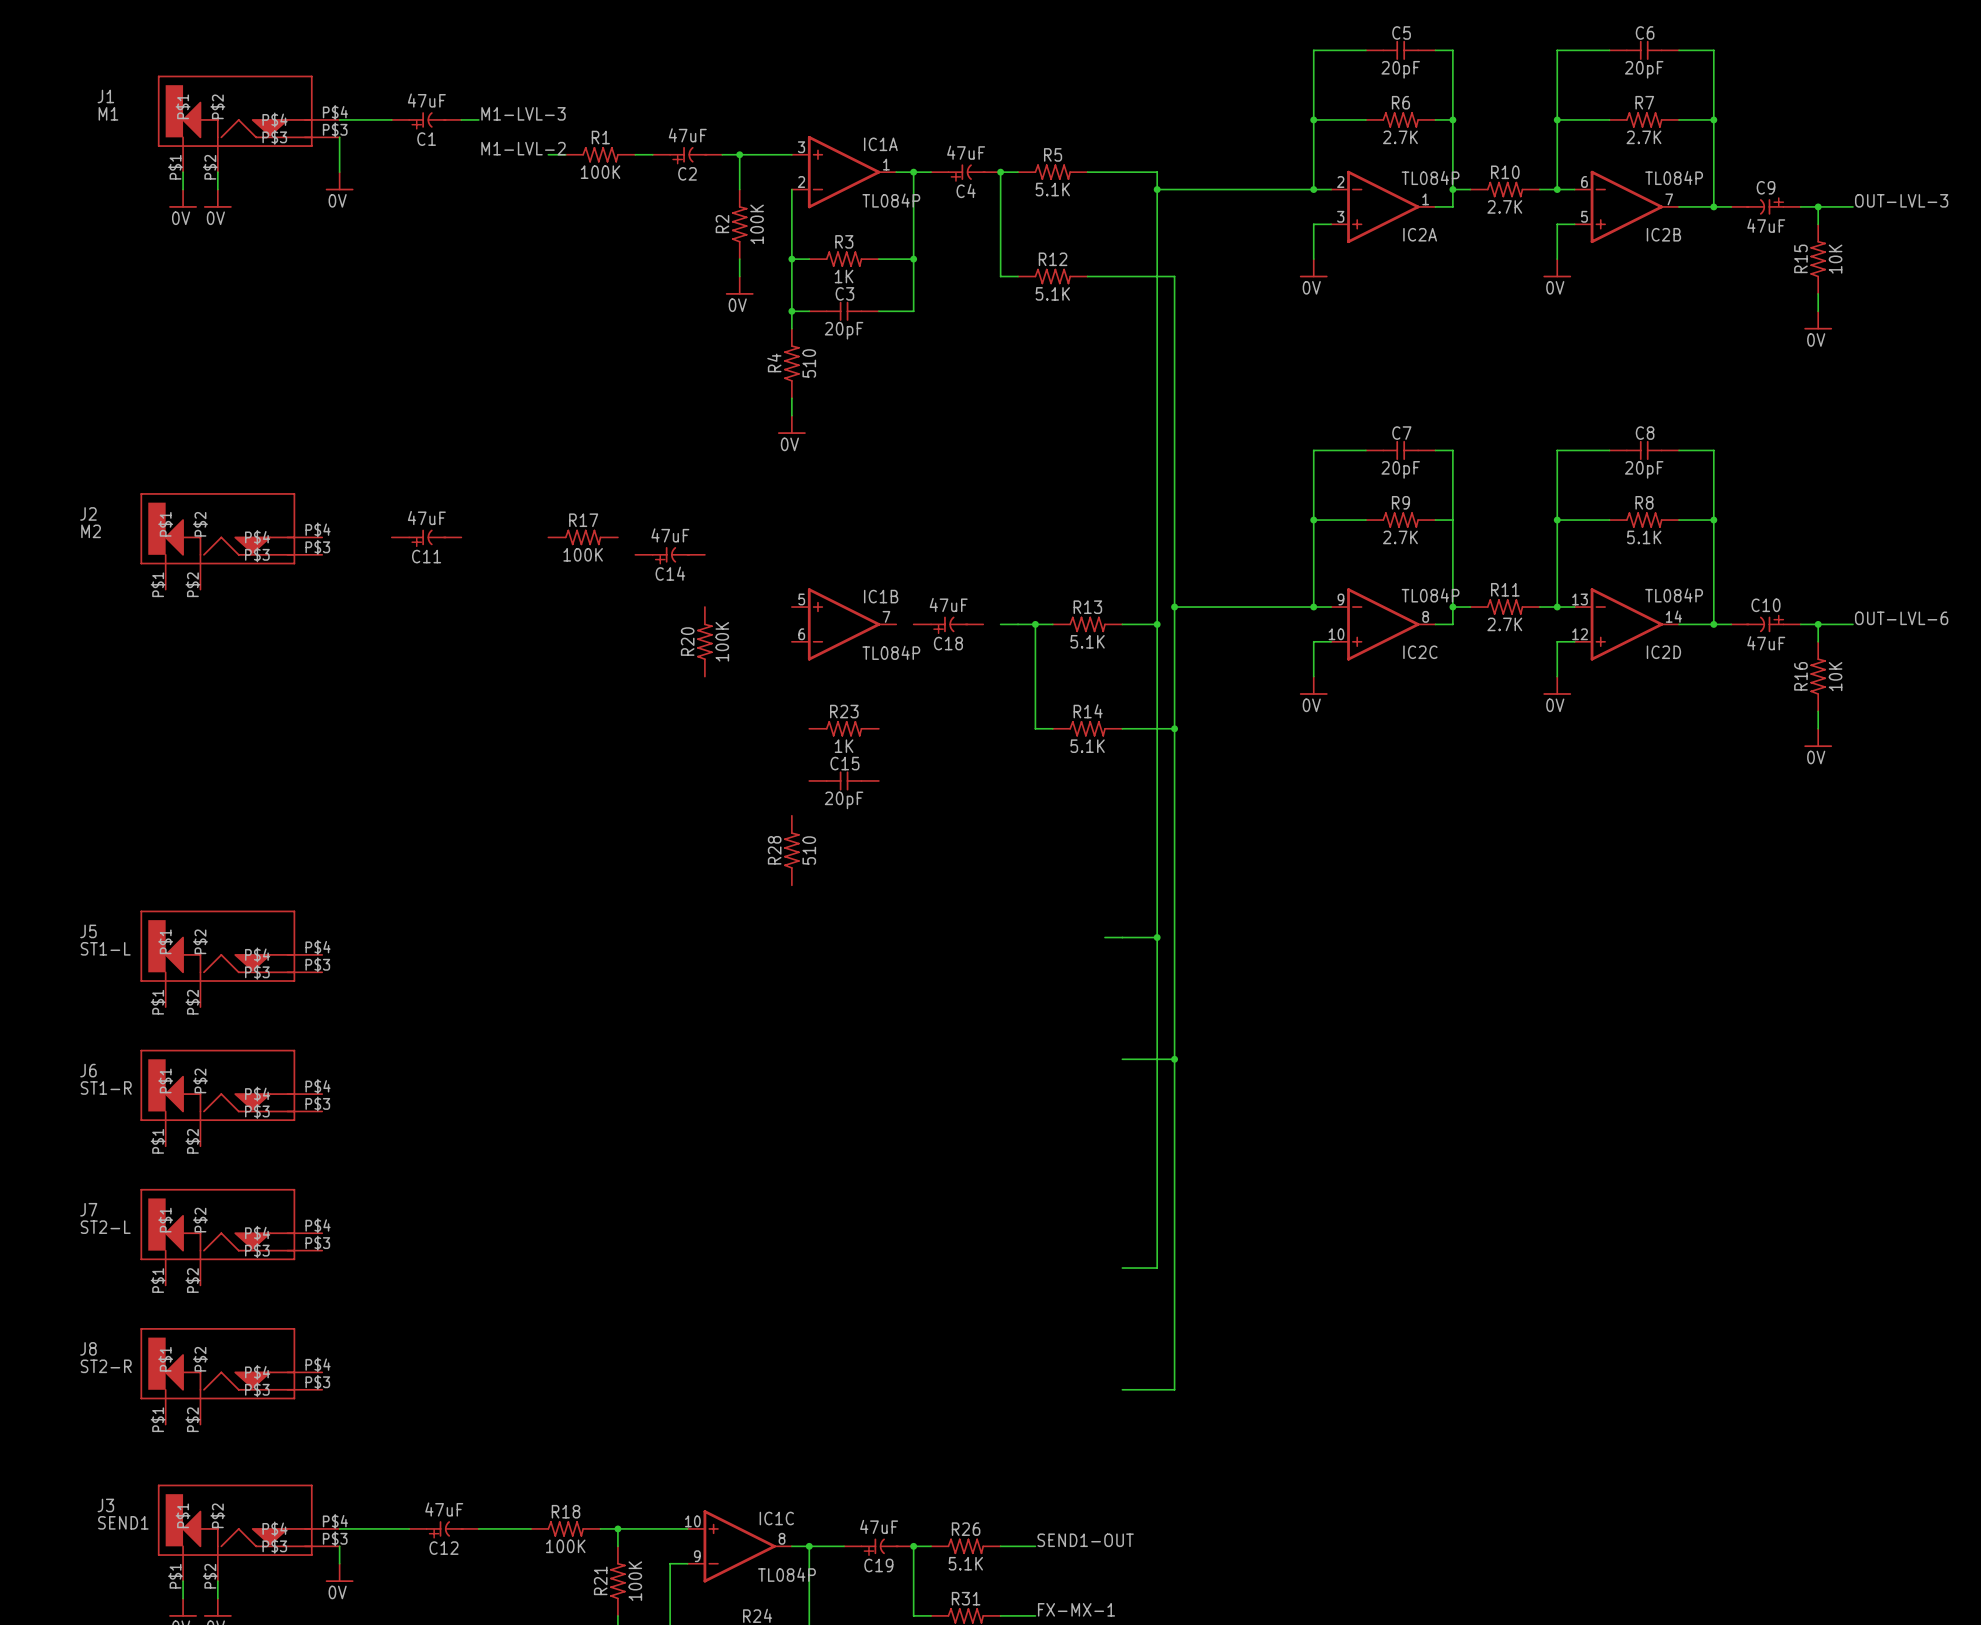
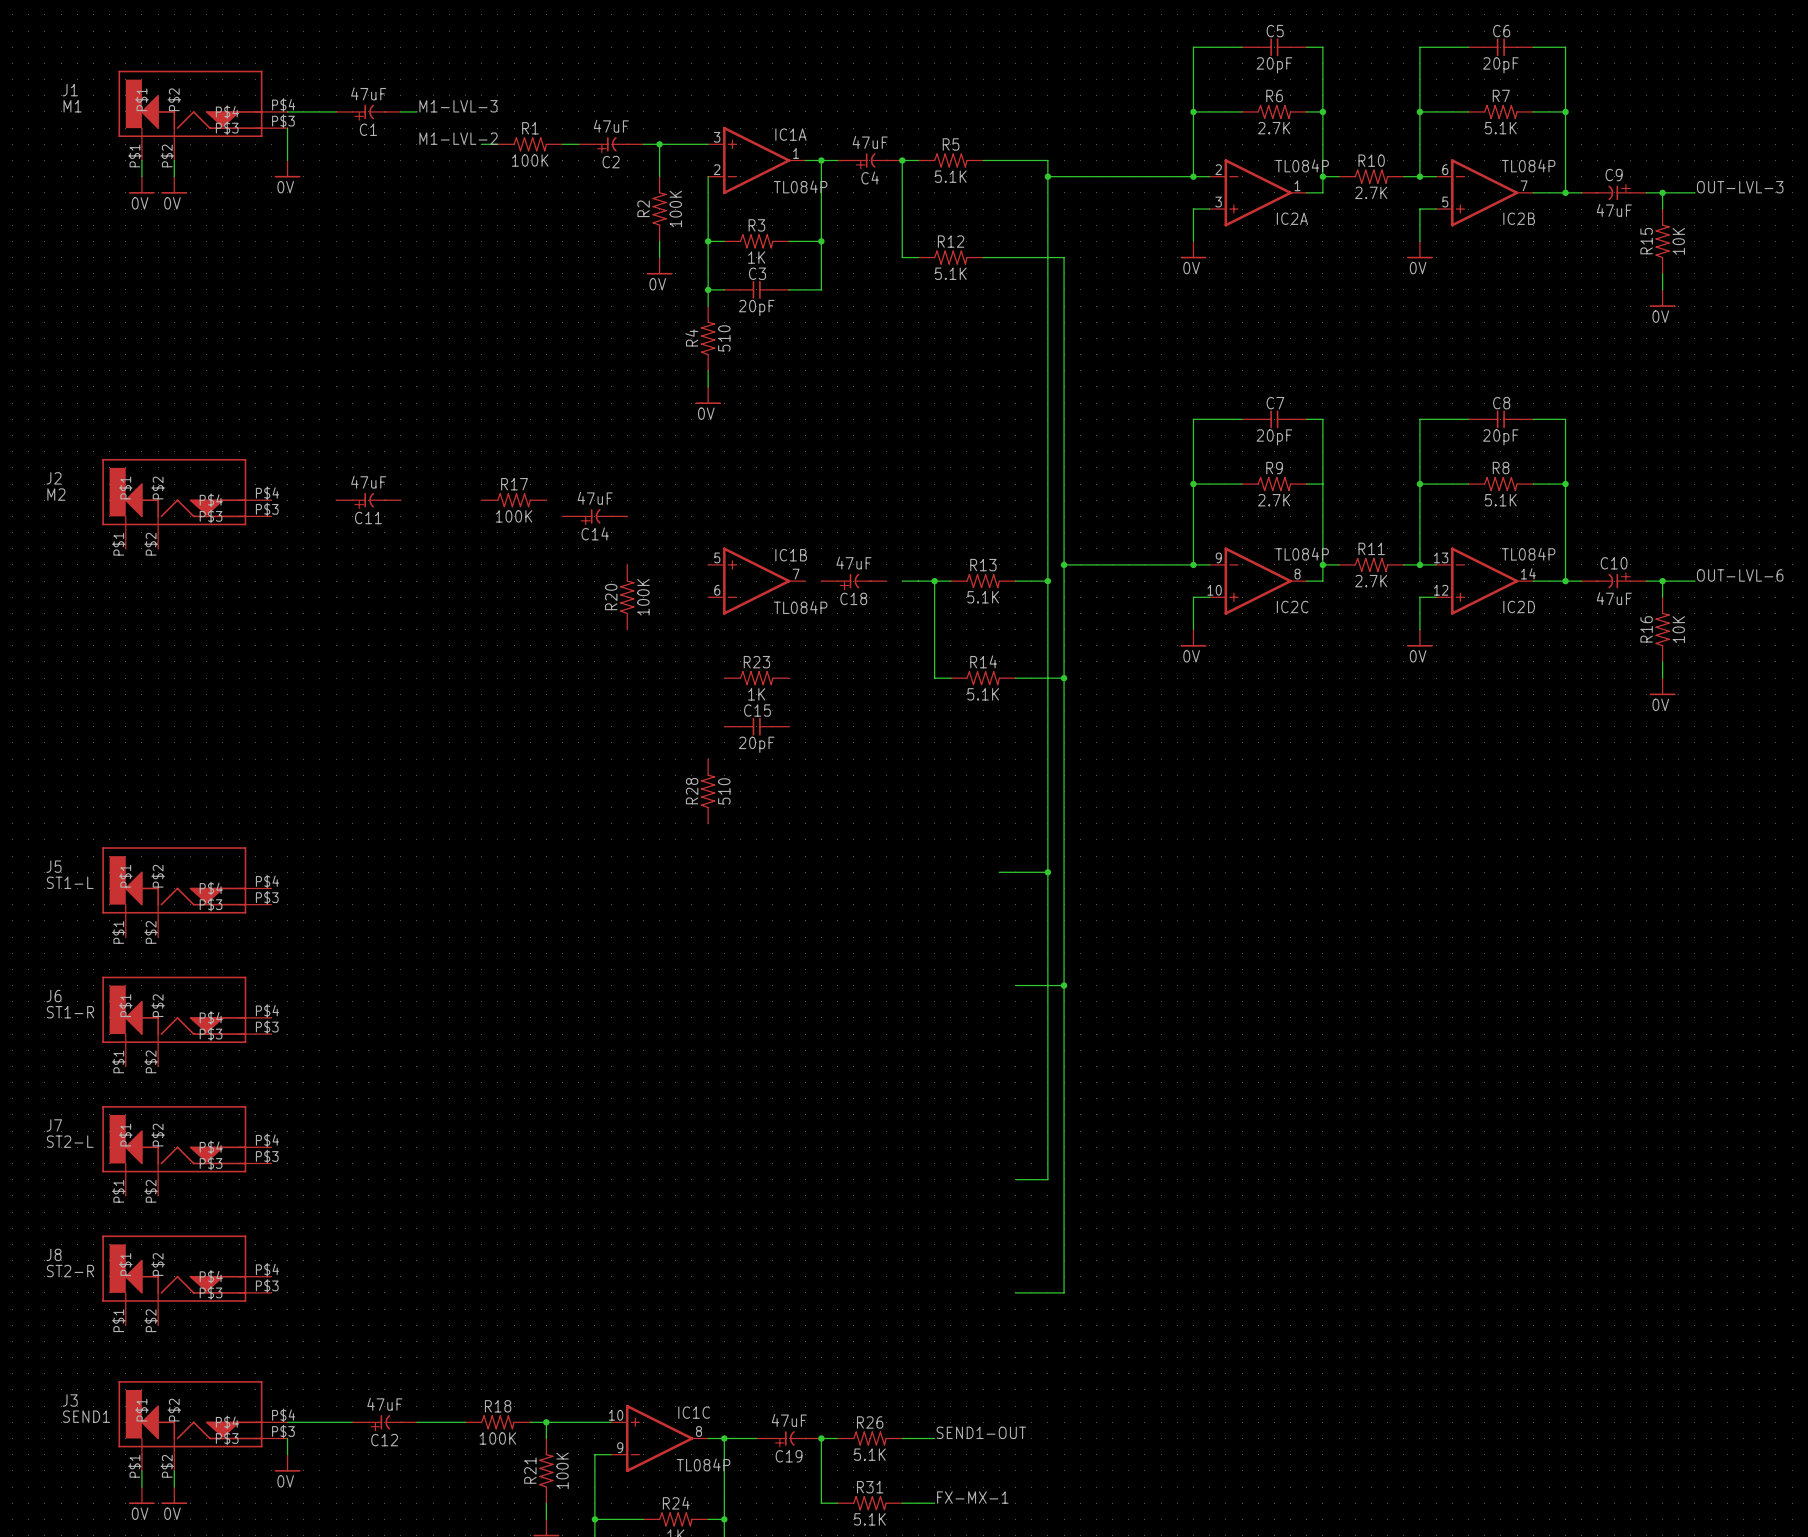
R7 value: 2.7K (1643, 137) -> 5.1K (1500, 128)

